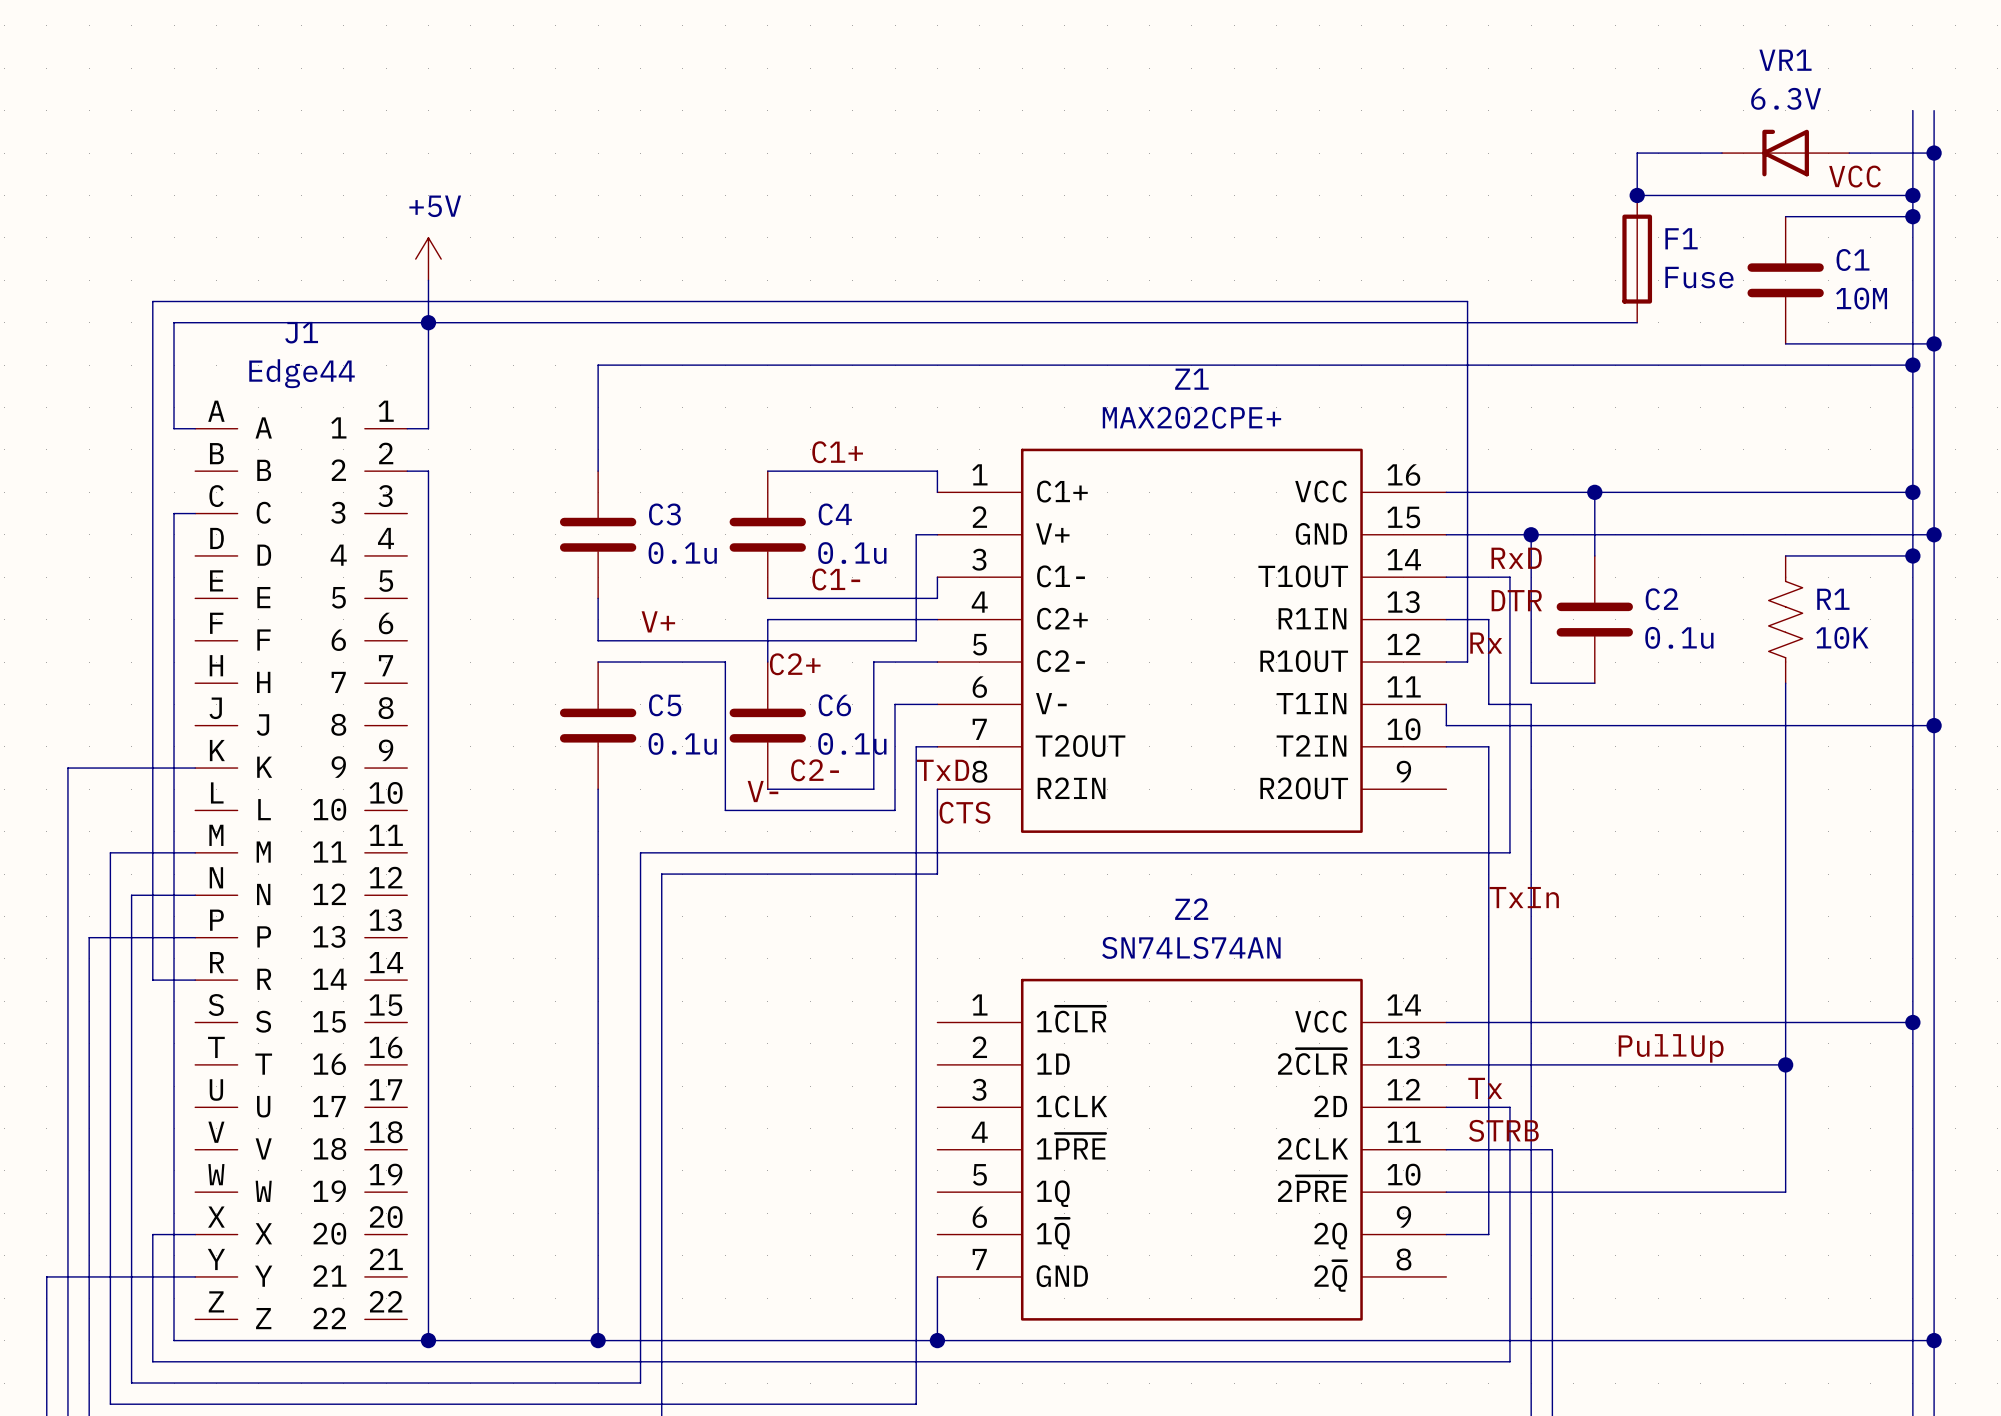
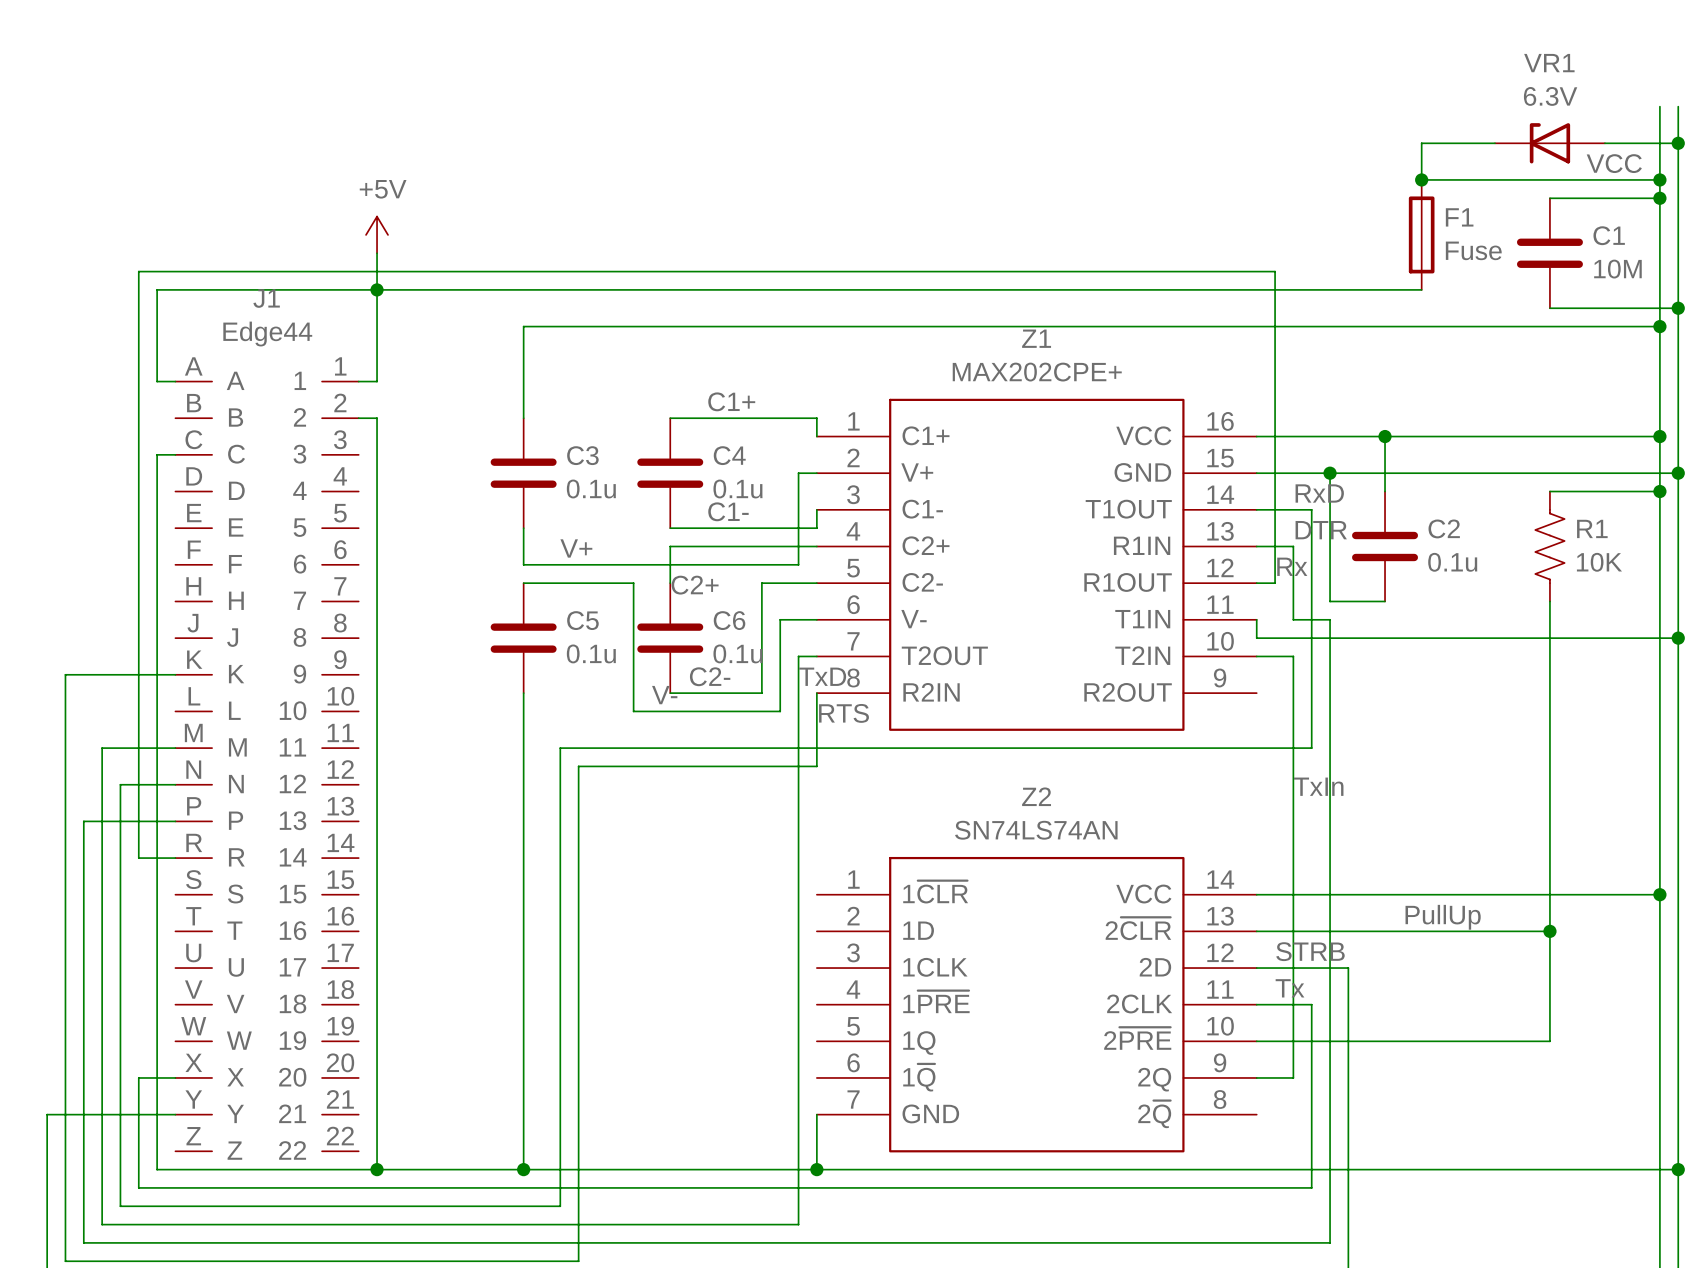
label: CTS (964, 812) -> RTS (844, 713)
label: Tx (1485, 1088) -> STRB (1310, 951)
wire: (1509, 1107) (1509, 1149) (1552, 1149) -> (1311, 968) (1348, 968) (1348, 1004)
label: STRB (1503, 1130) -> Tx (1290, 988)

